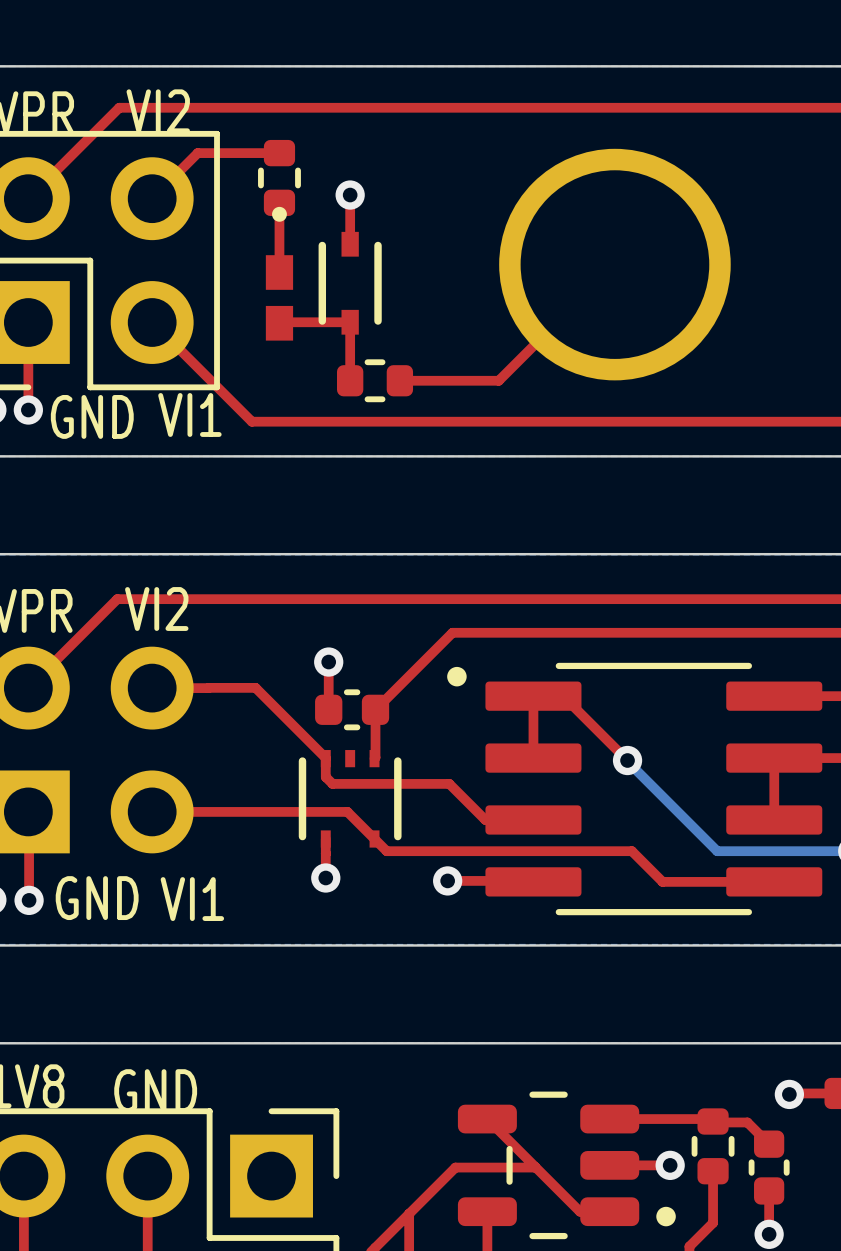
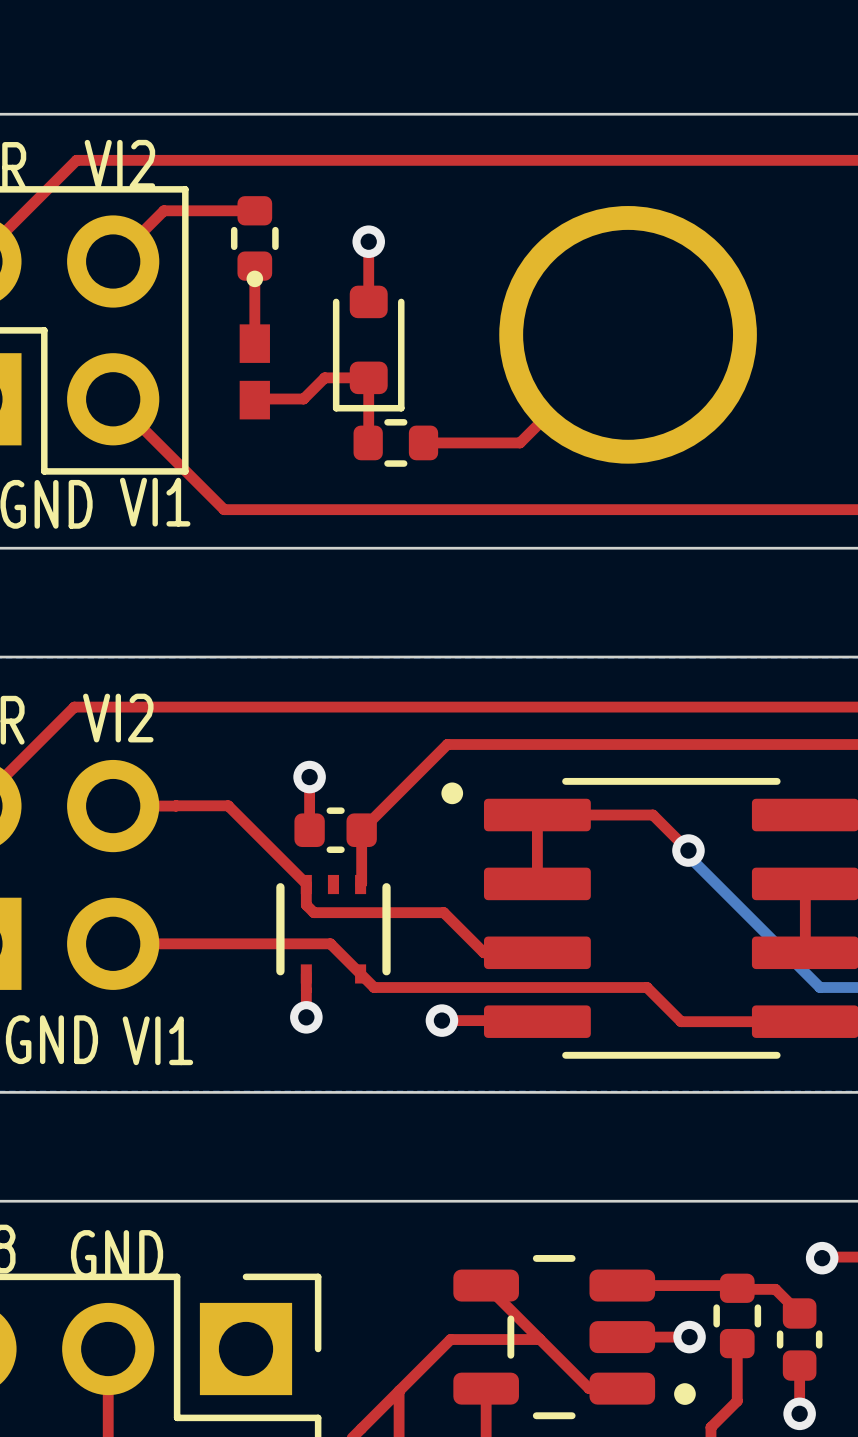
top track: none -> (368, 241) (368, 301)
top track: (350, 195) (350, 244) -> none
via position: (350, 195) -> (368, 241)
part footprint: [318, 231, 382, 335] -> [332, 285, 405, 412]
top track: (323, 322) (350, 322) (350, 380) -> (303, 399) (324, 377) (368, 377) (368, 441)
top track: (517, 361) (498, 380) (399, 380) -> (519, 442) (423, 442)
part position: (375, 380) -> (395, 442)
top track: (563, 696) (627, 760) -> (570, 815) (652, 815) (688, 850)
bottom track: (627, 760) (717, 851) (787, 851) -> (688, 850) (688, 855) (820, 987)
via position: (627, 760) -> (688, 850)

